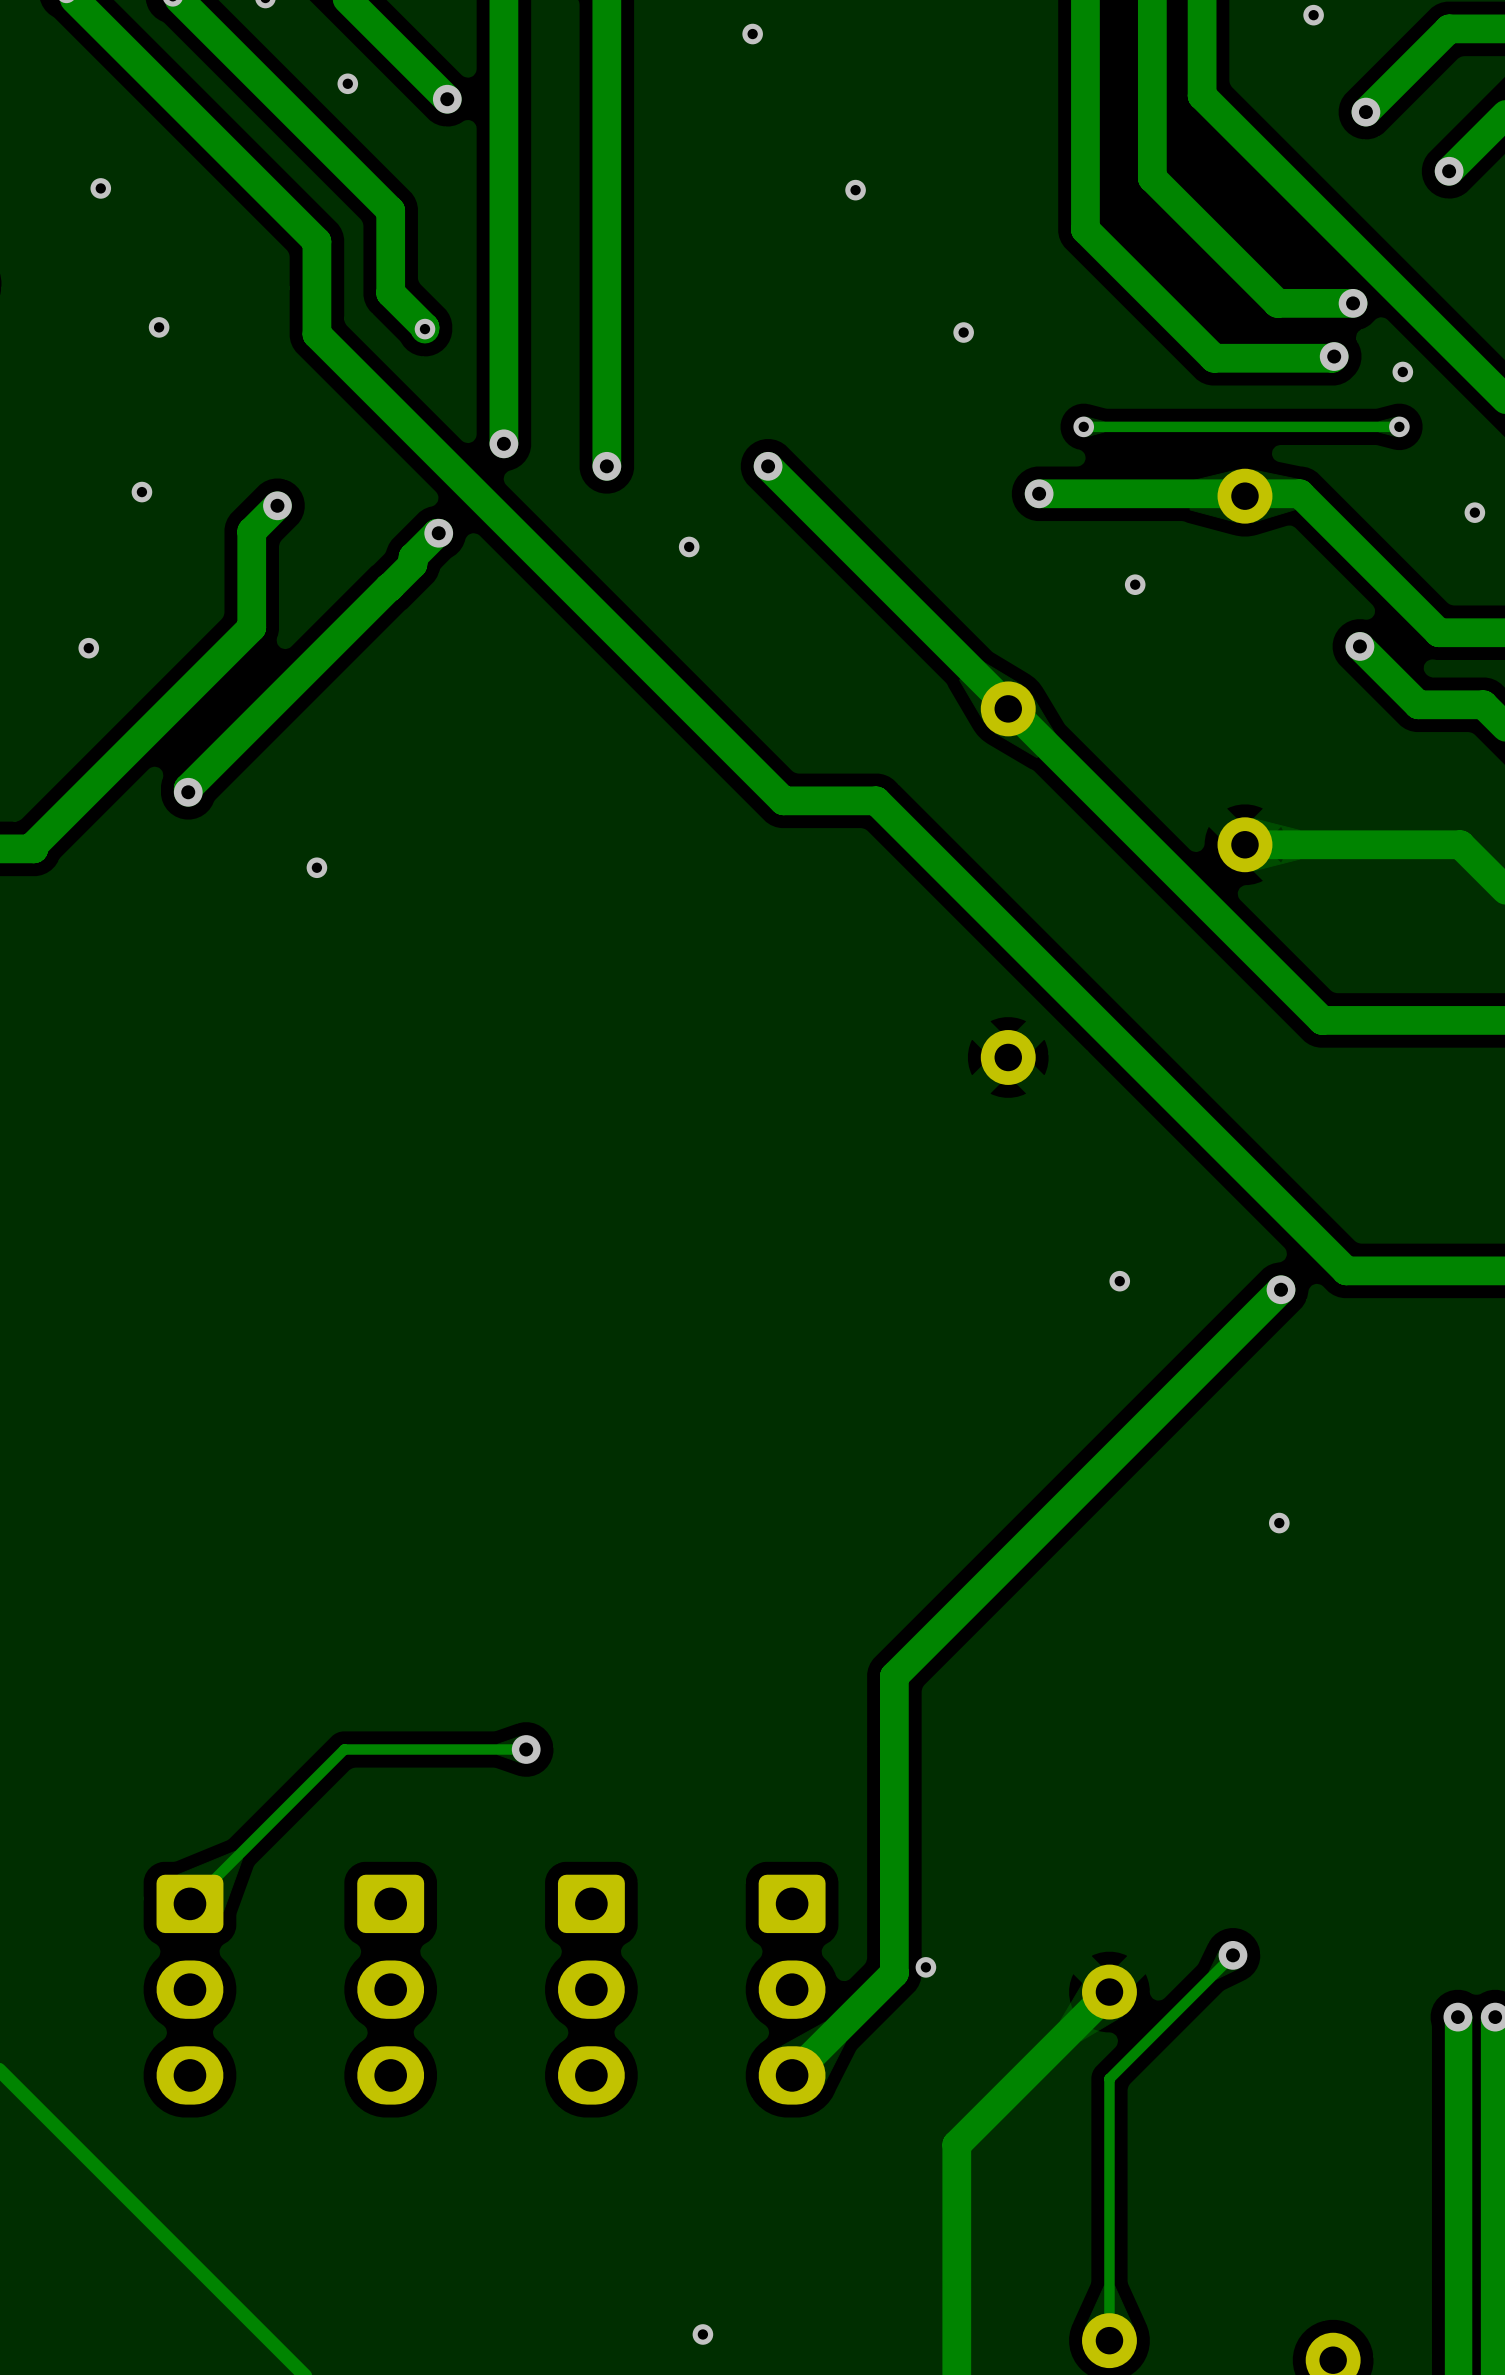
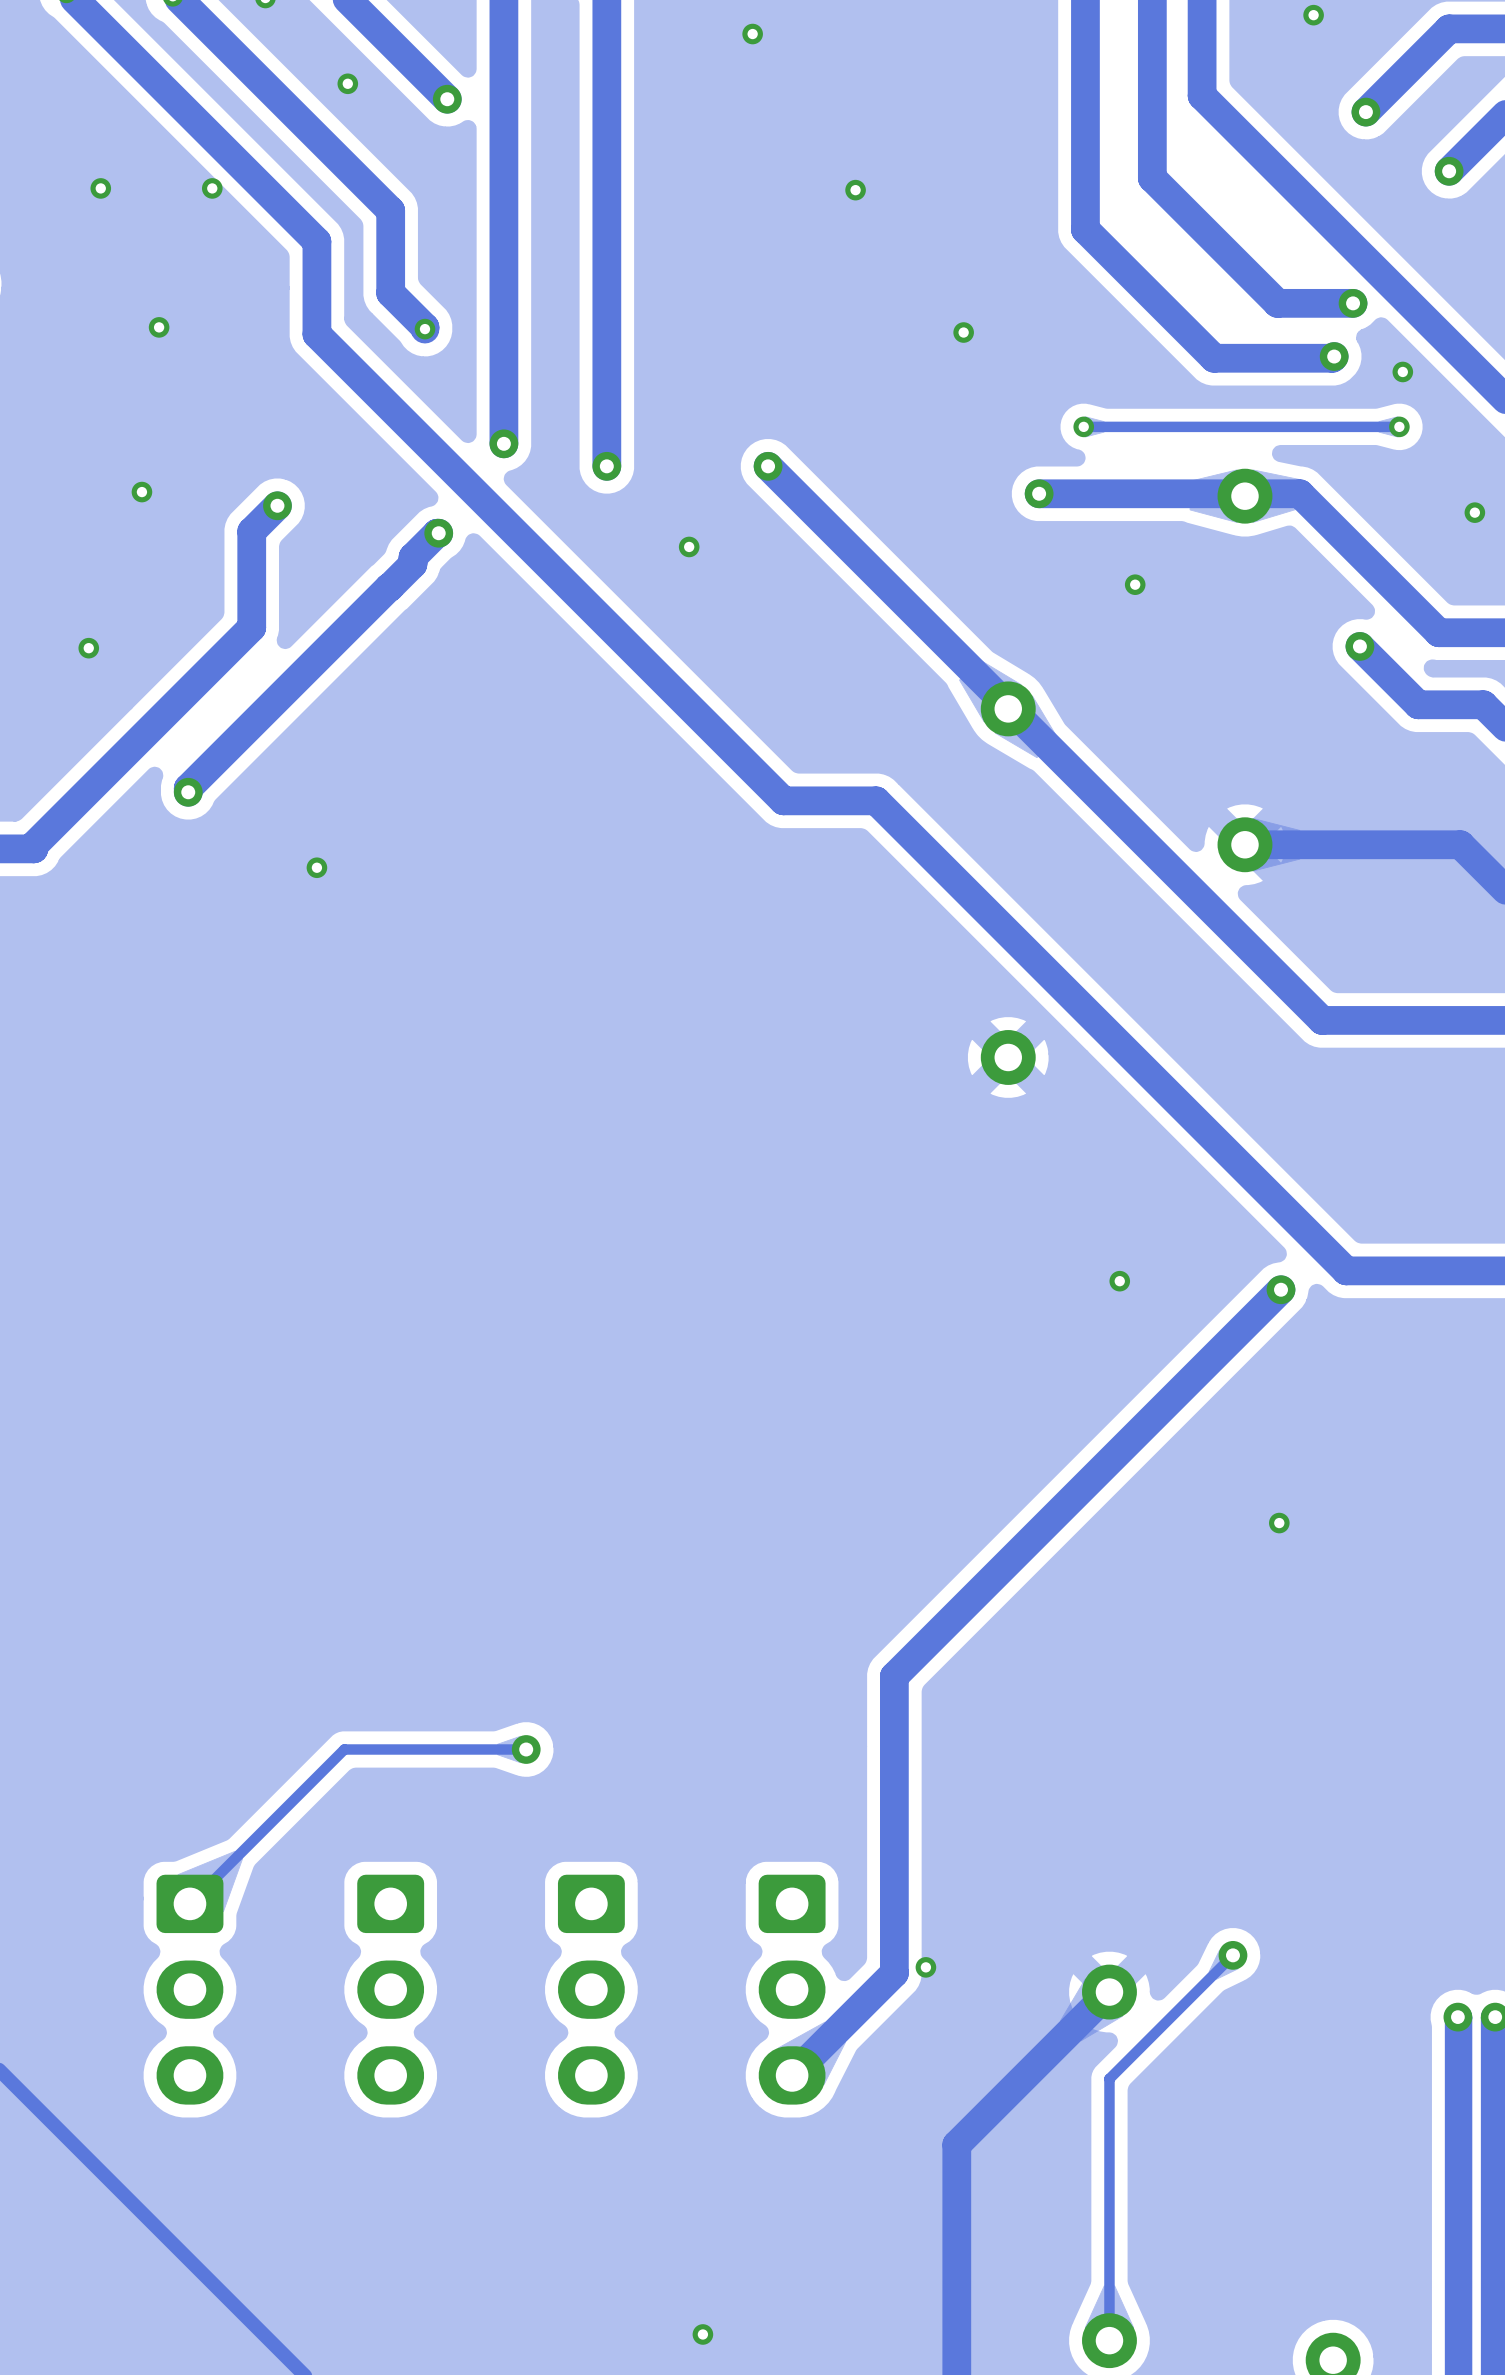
via: none -> (212, 188)

